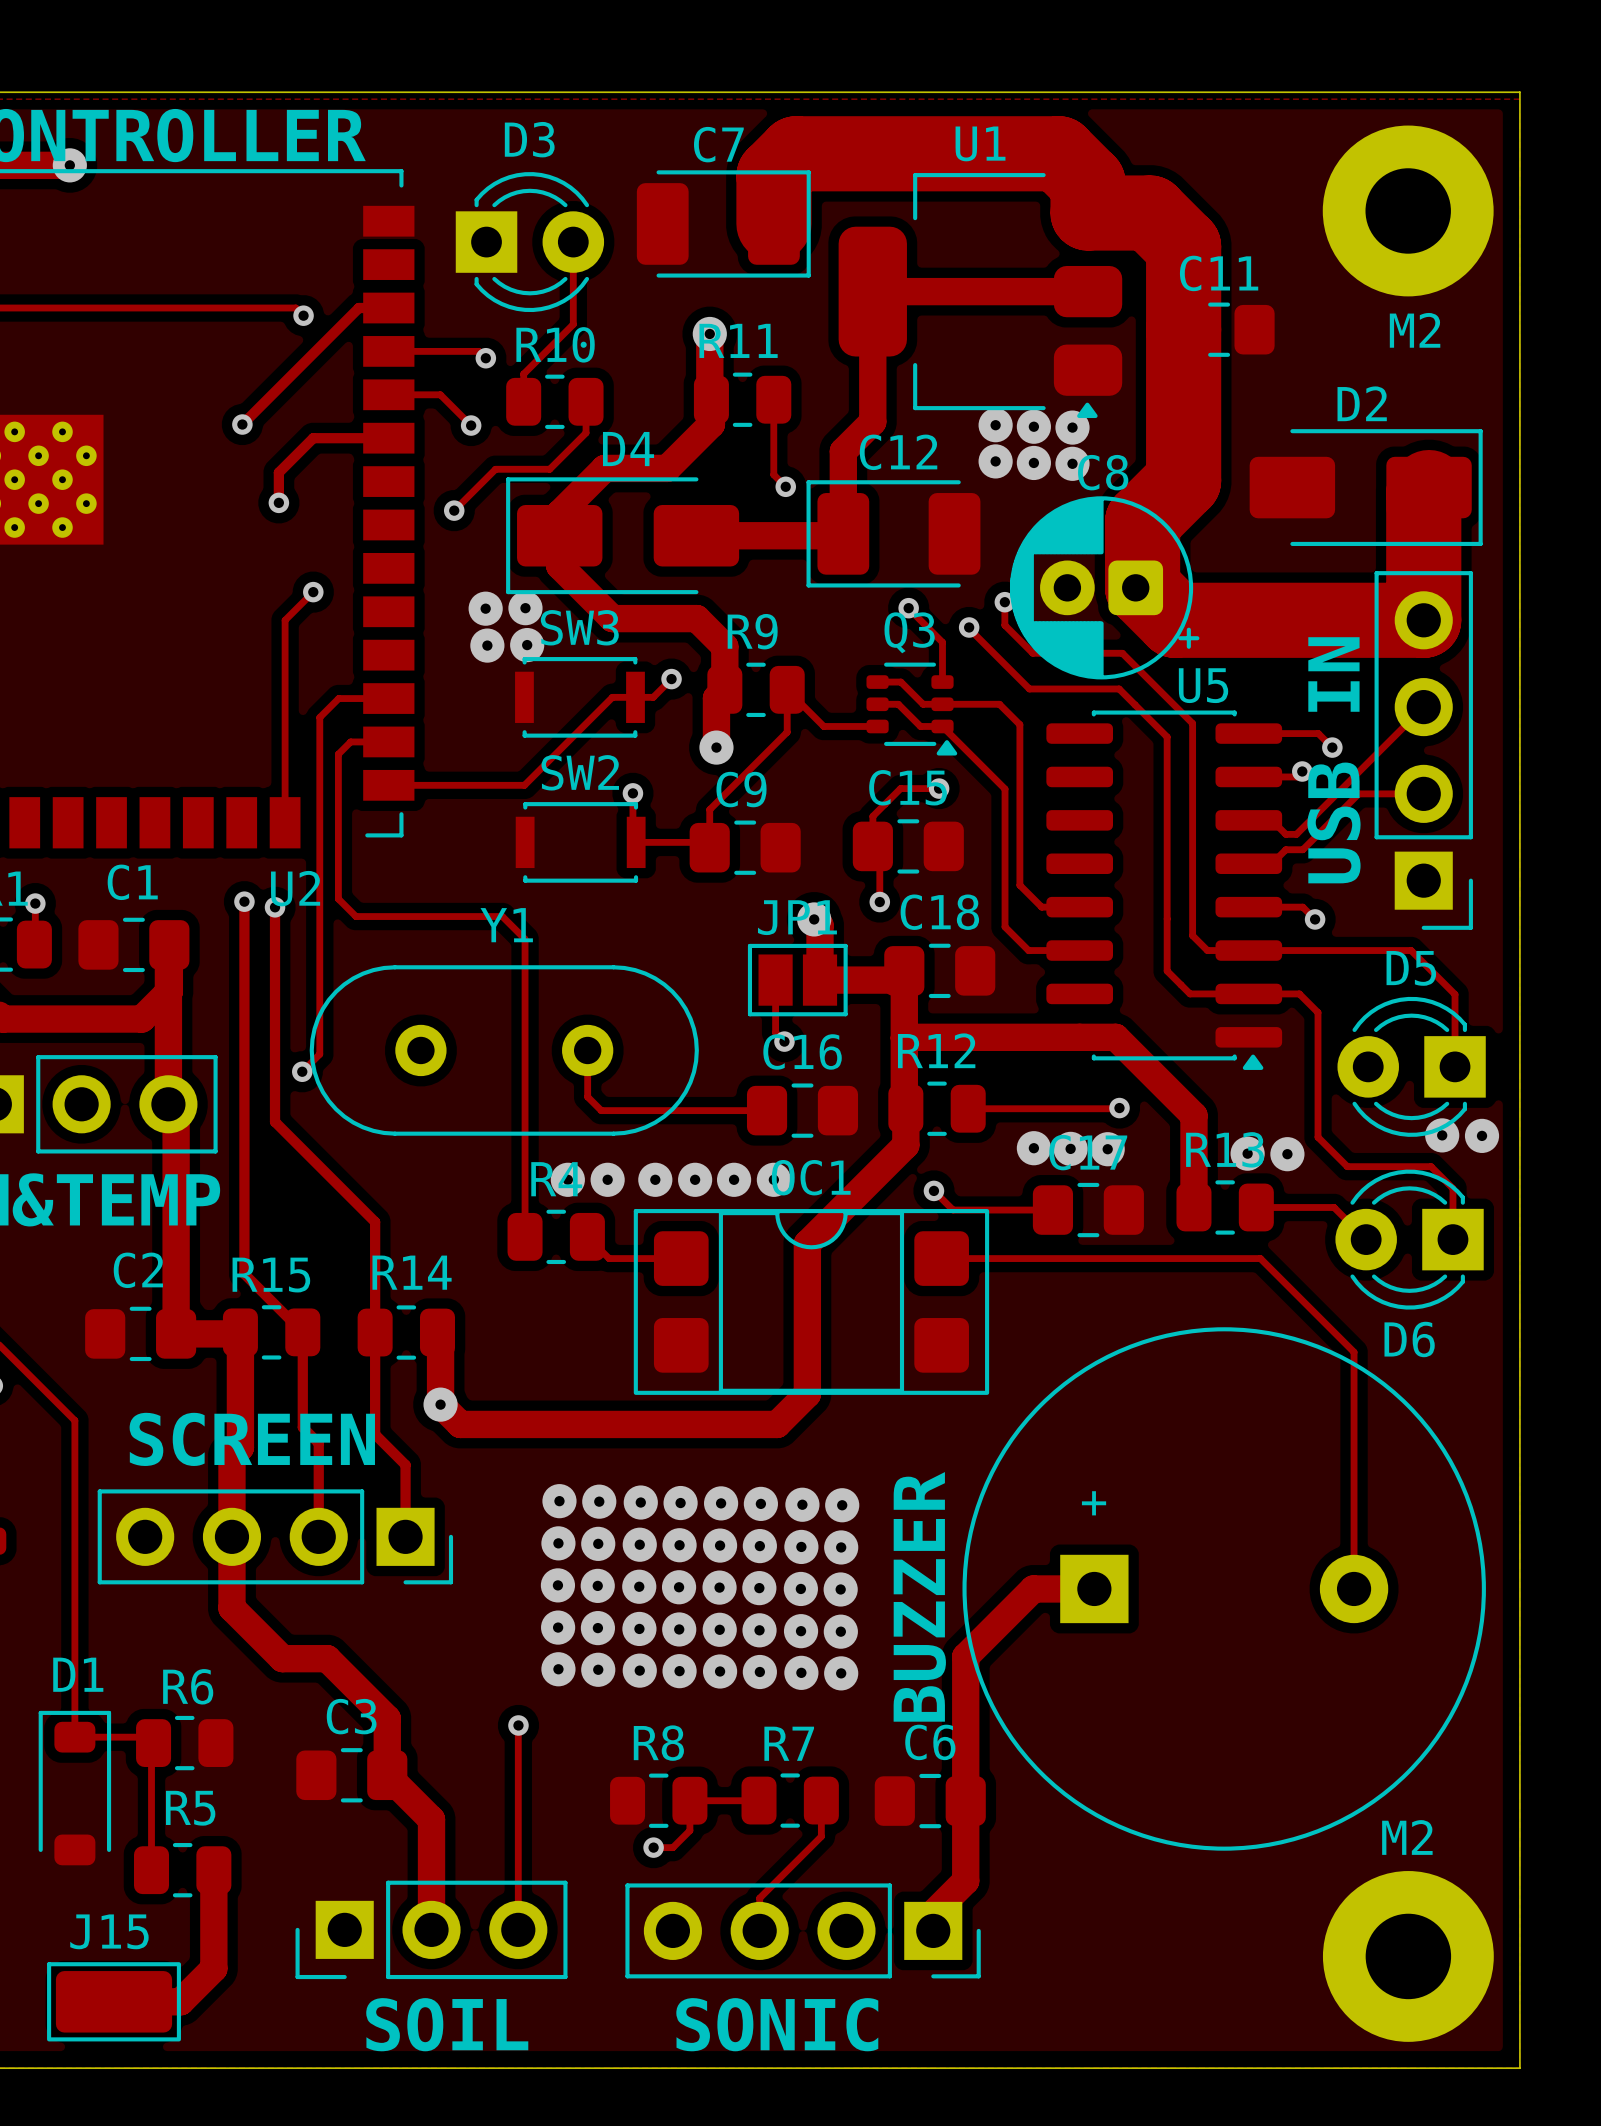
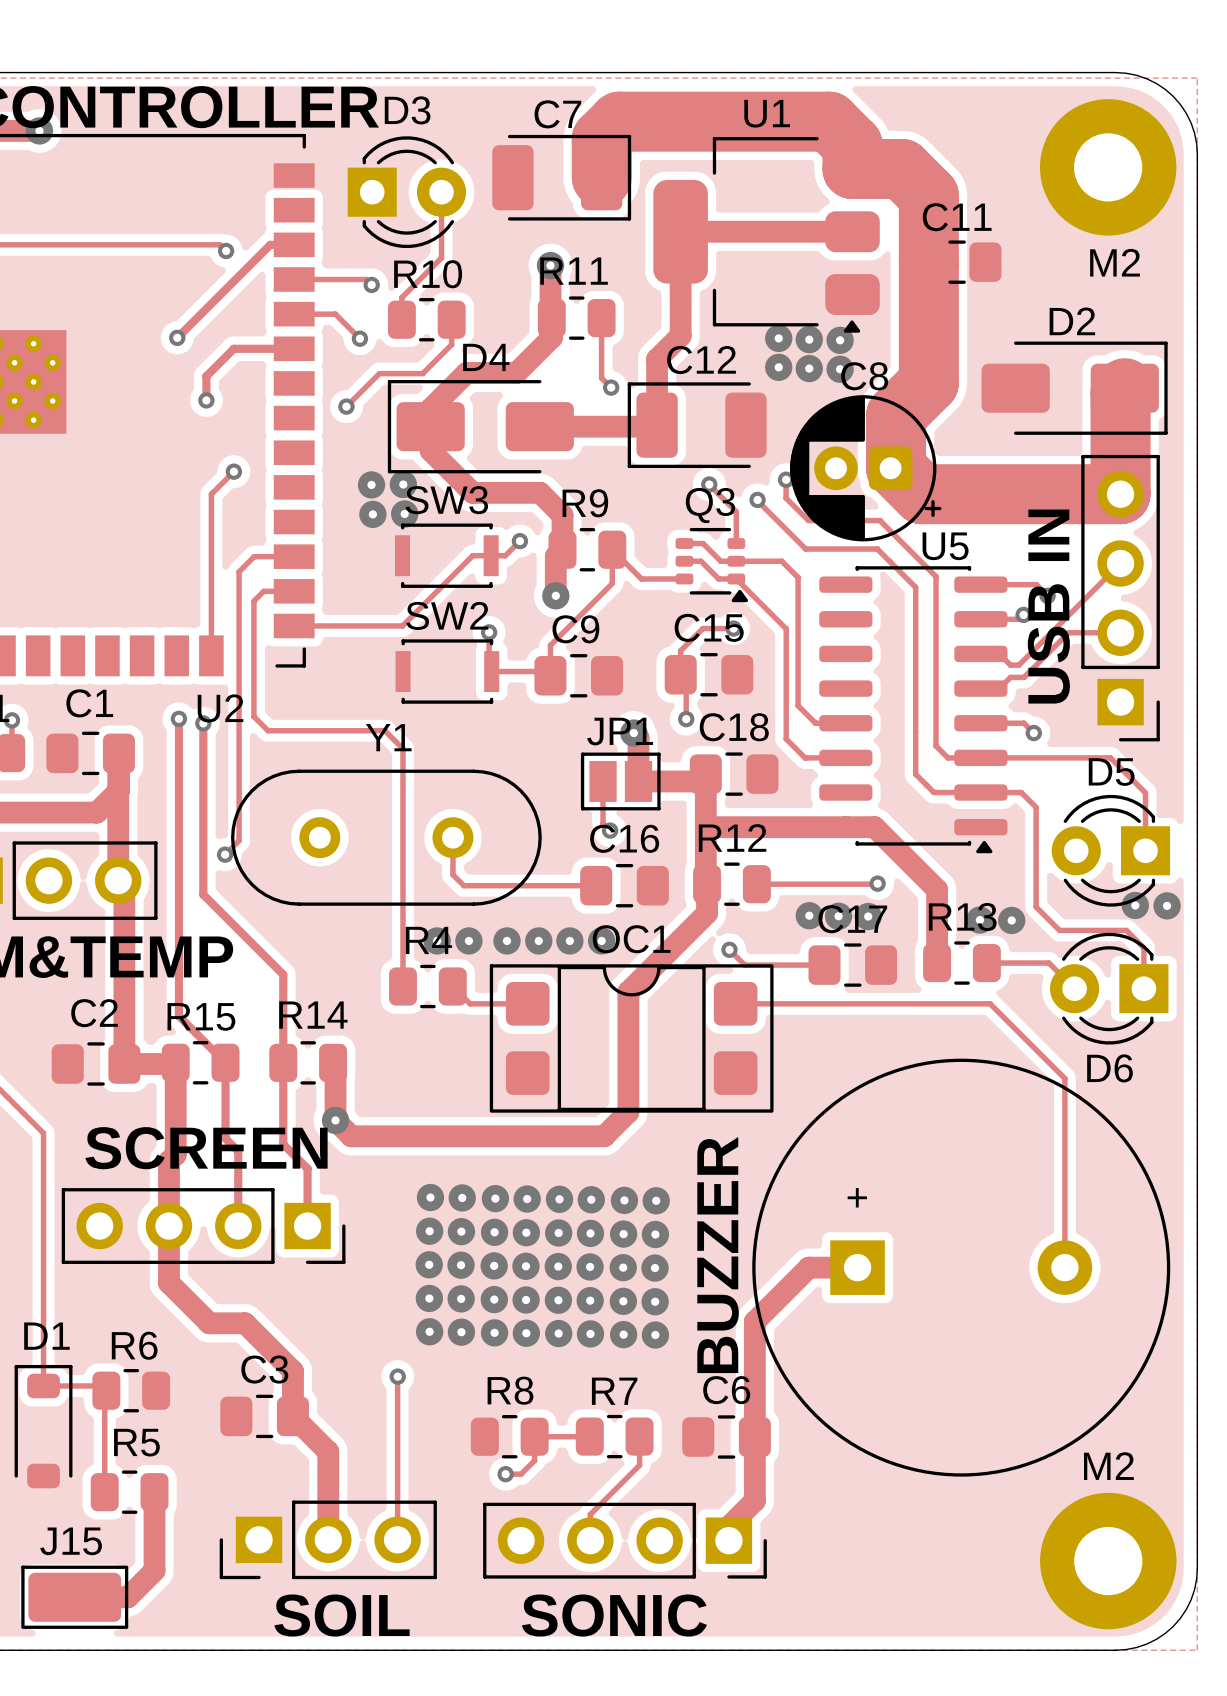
board edge: (1417, 92) (1519, 92) (1519, 194) -> (1115, 72) (1146, 78) (1173, 96) (1191, 123) (1197, 154)
board edge: (1519, 1965) (1519, 2068) (1417, 2068) -> (1197, 1568) (1191, 1599) (1173, 1626) (1146, 1644) (1115, 1650)

